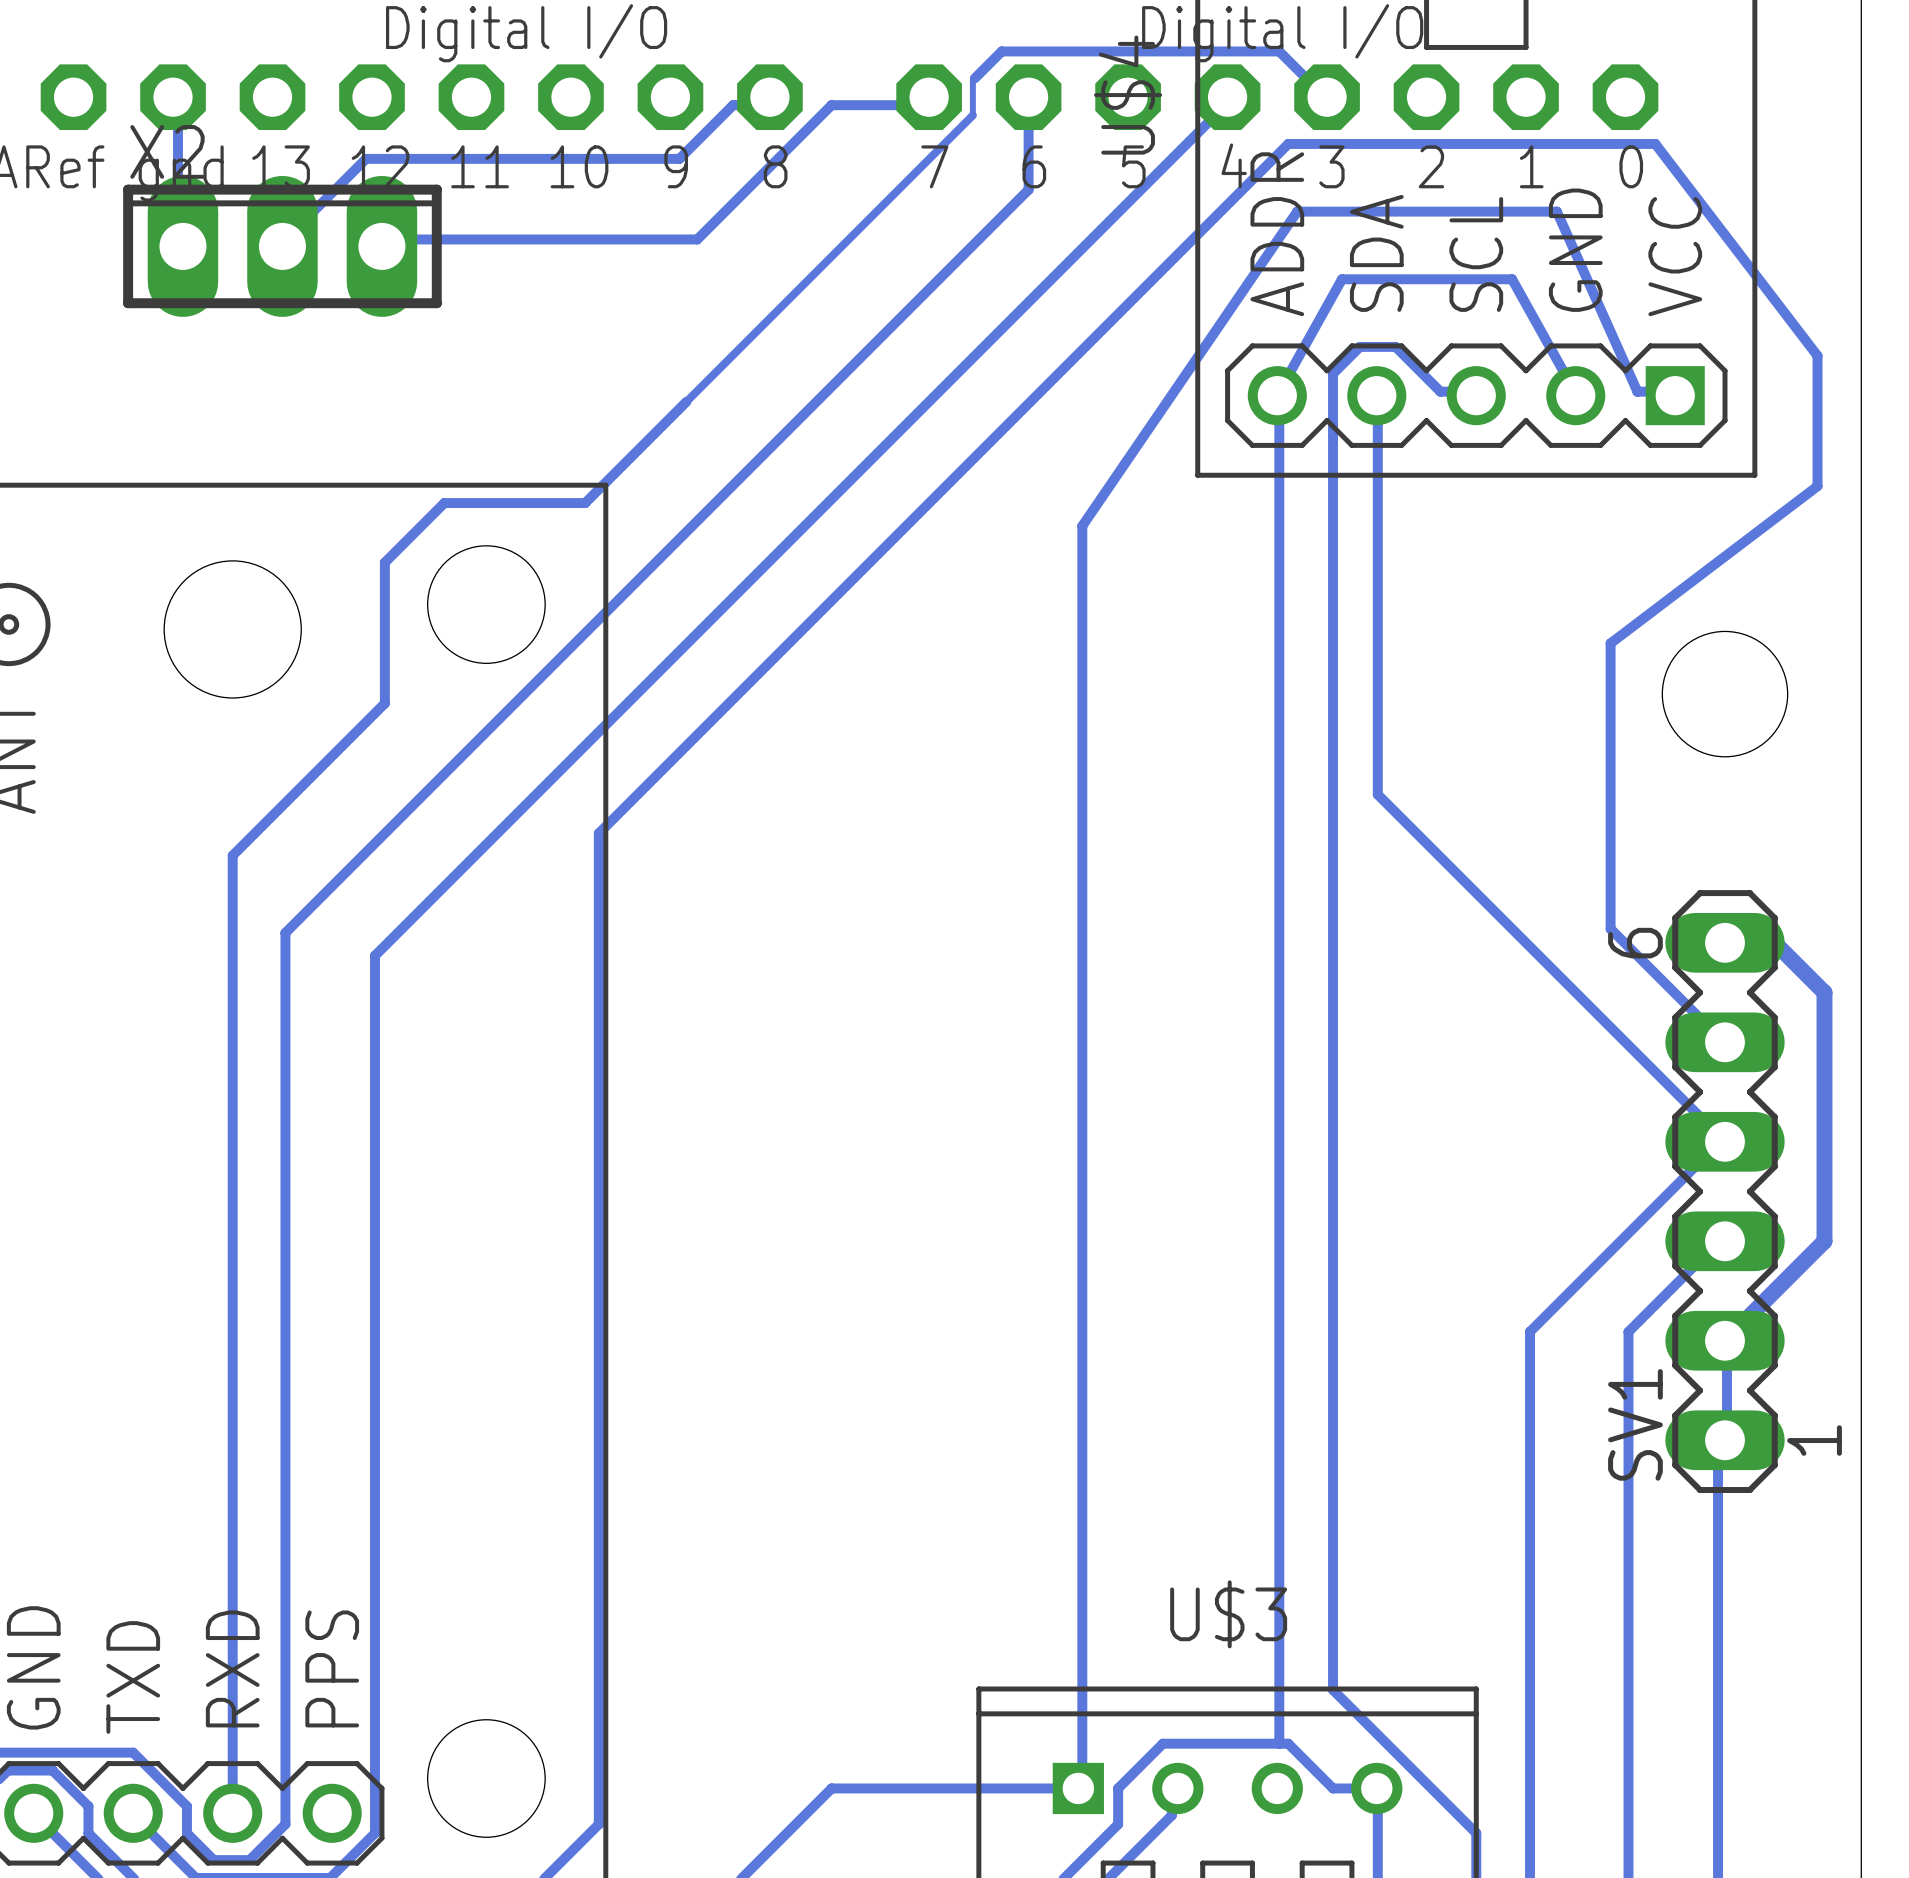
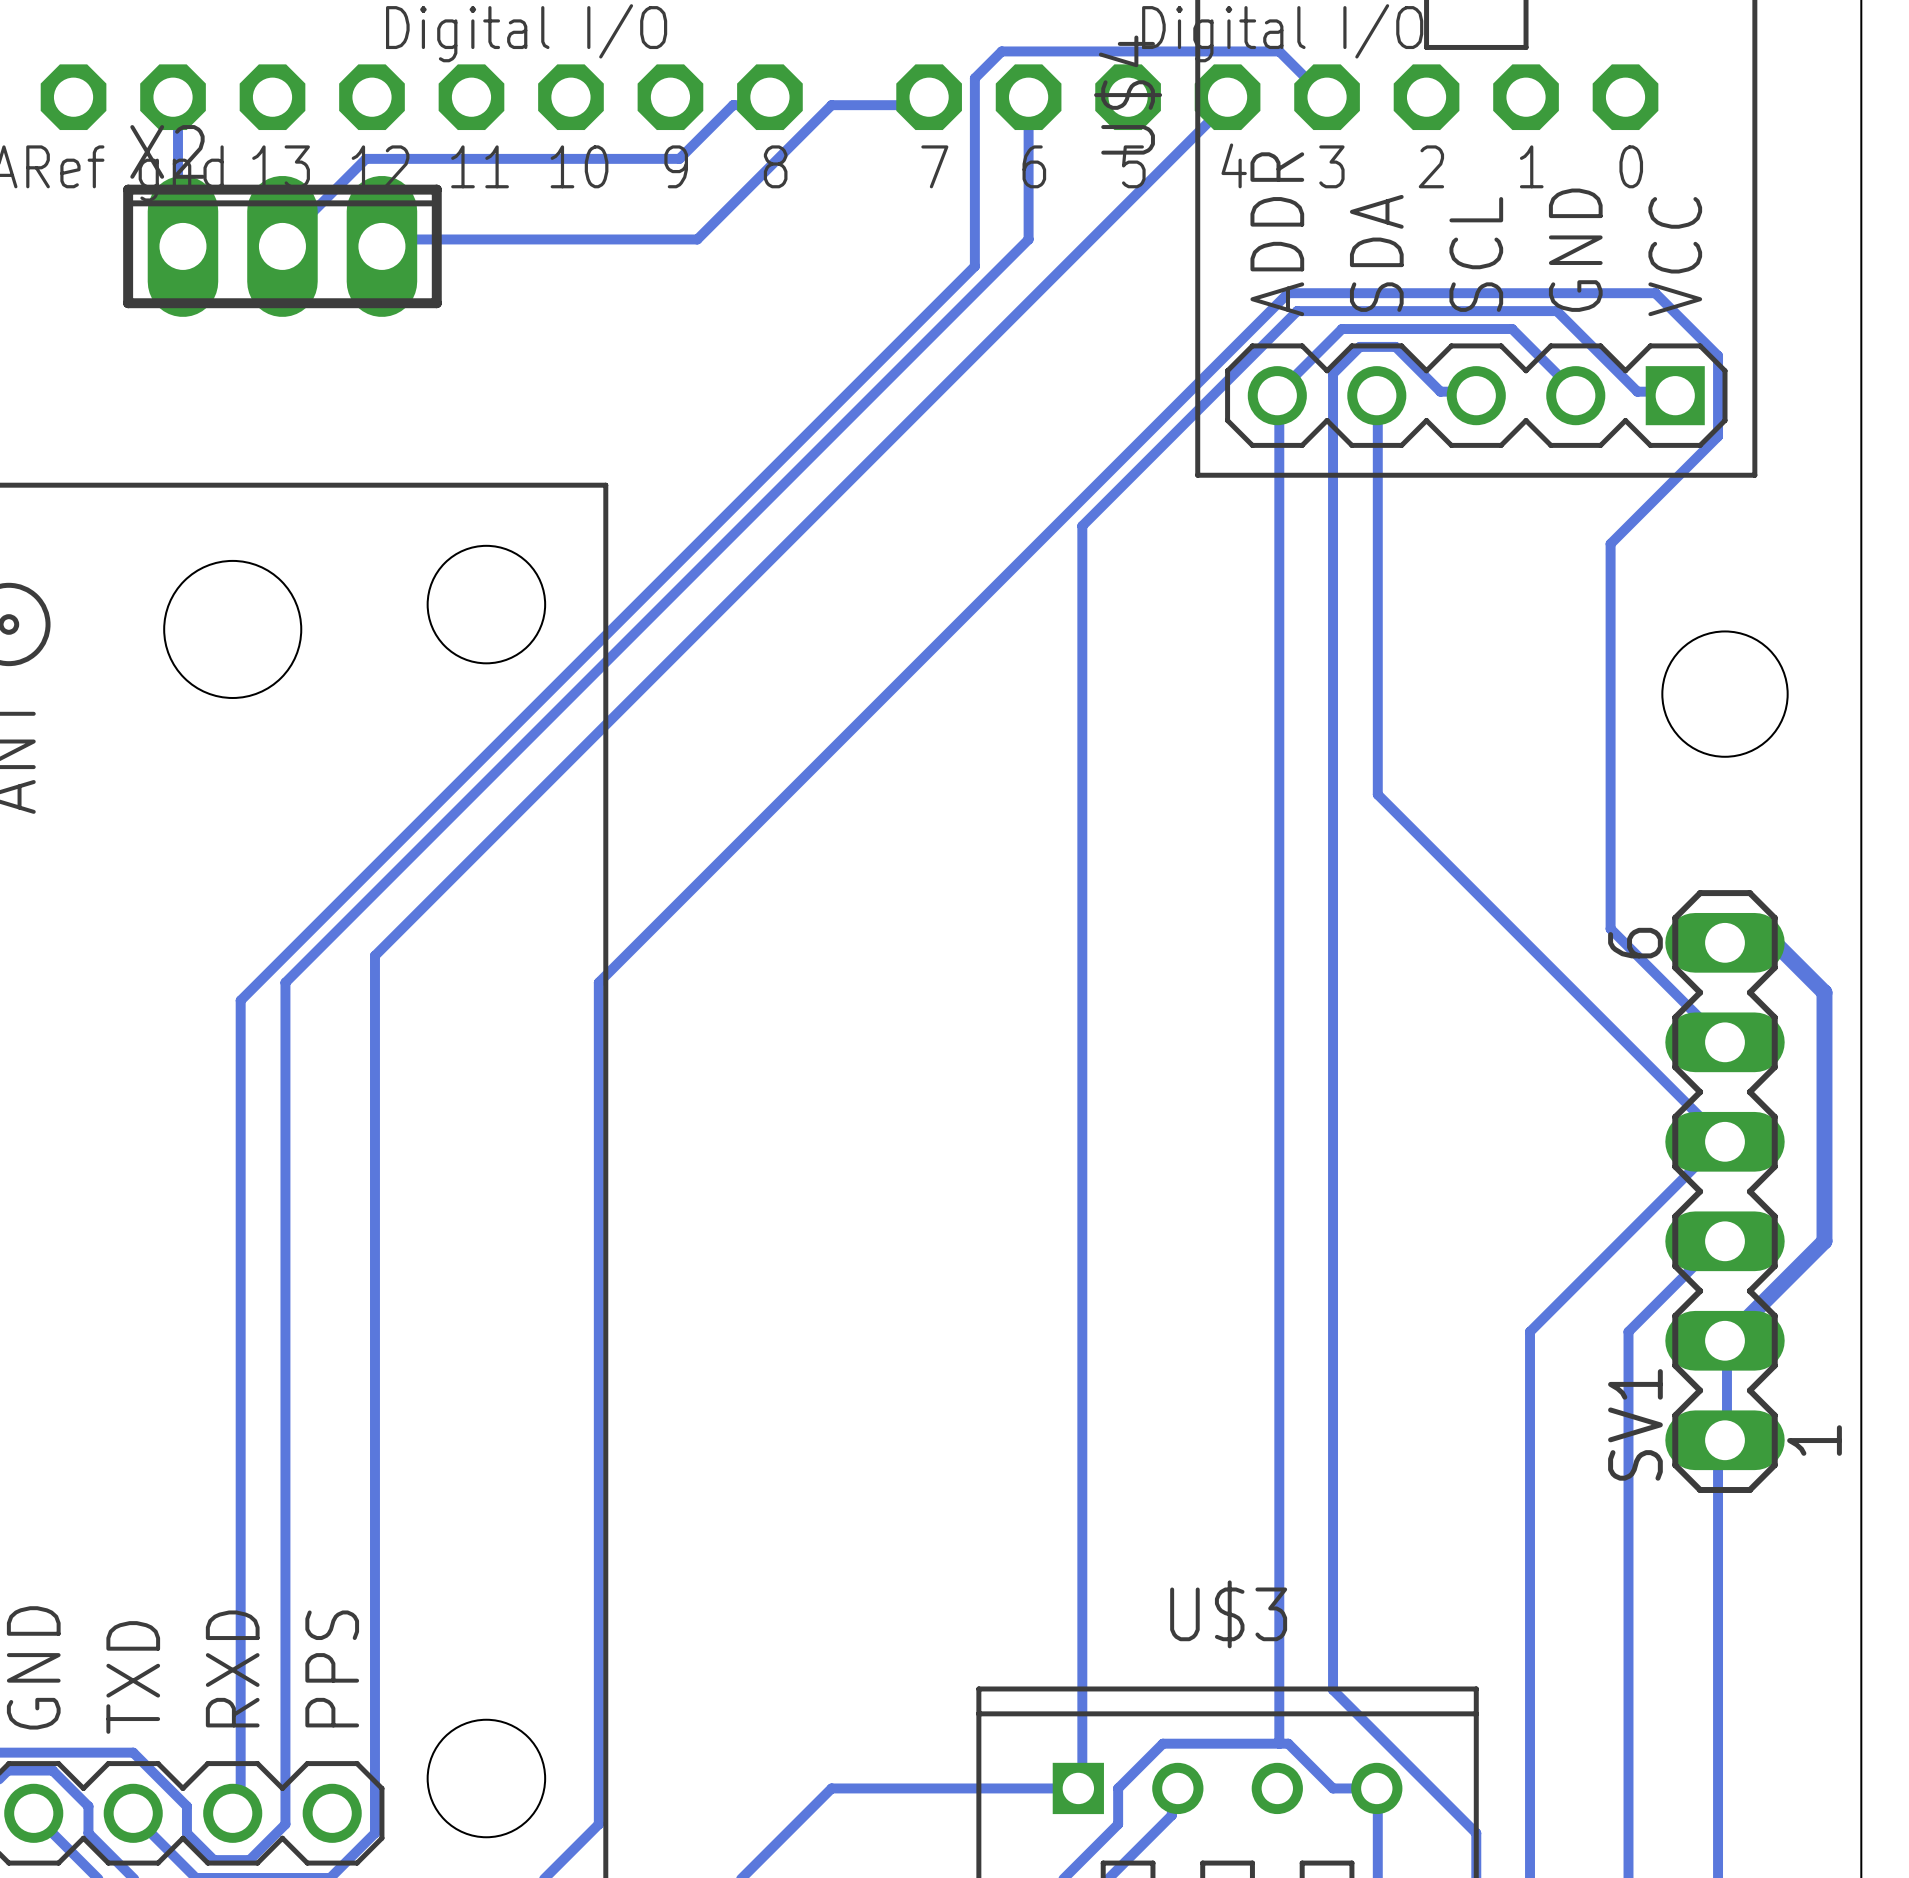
bottom track: (974, 78) (972, 80) (972, 115) (585, 503) (444, 503) (384, 562) (384, 703) (232, 855) (232, 1813) -> (974, 78) (974, 266) (240, 1000) (240, 1806)
bottom track: (1028, 189) (285, 932) (285, 982) -> (1028, 189) (1028, 239) (285, 982)
bottom track: (1279, 391) (1341, 279) (1512, 279) (1574, 391) -> (1279, 391) (1341, 329) (1512, 329) (1574, 391)
bottom track: (1637, 391) (1556, 211) (1297, 211) (1082, 525) -> (1637, 391) (1556, 311) (1297, 311) (1082, 525)
bottom track: (1610, 643) (1817, 486) (1817, 355) (1655, 143) (1288, 143) (598, 833) (598, 982) -> (1610, 643) (1610, 543) (1718, 436) (1718, 355) (1655, 293) (1288, 293) (598, 982)

